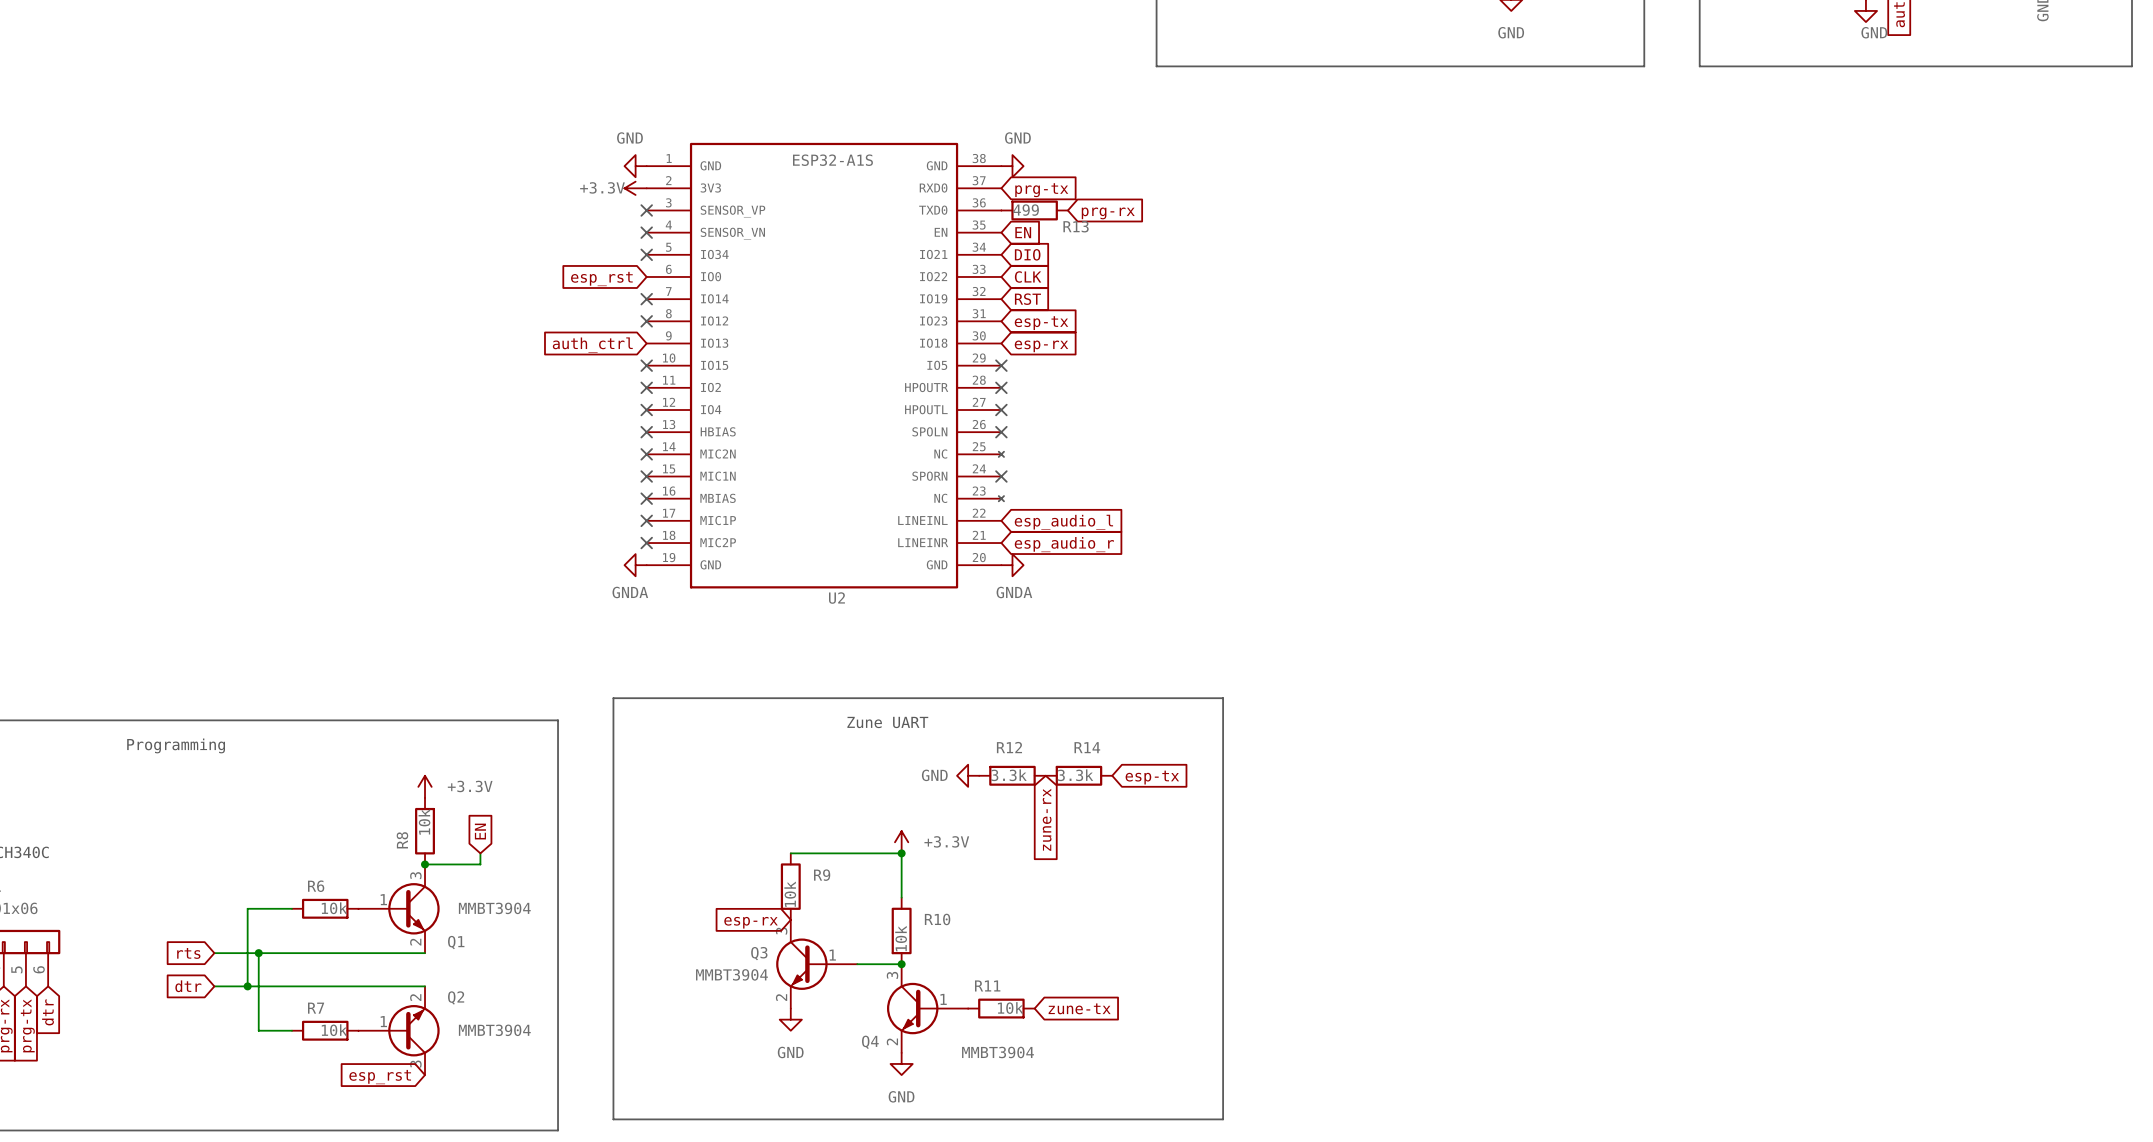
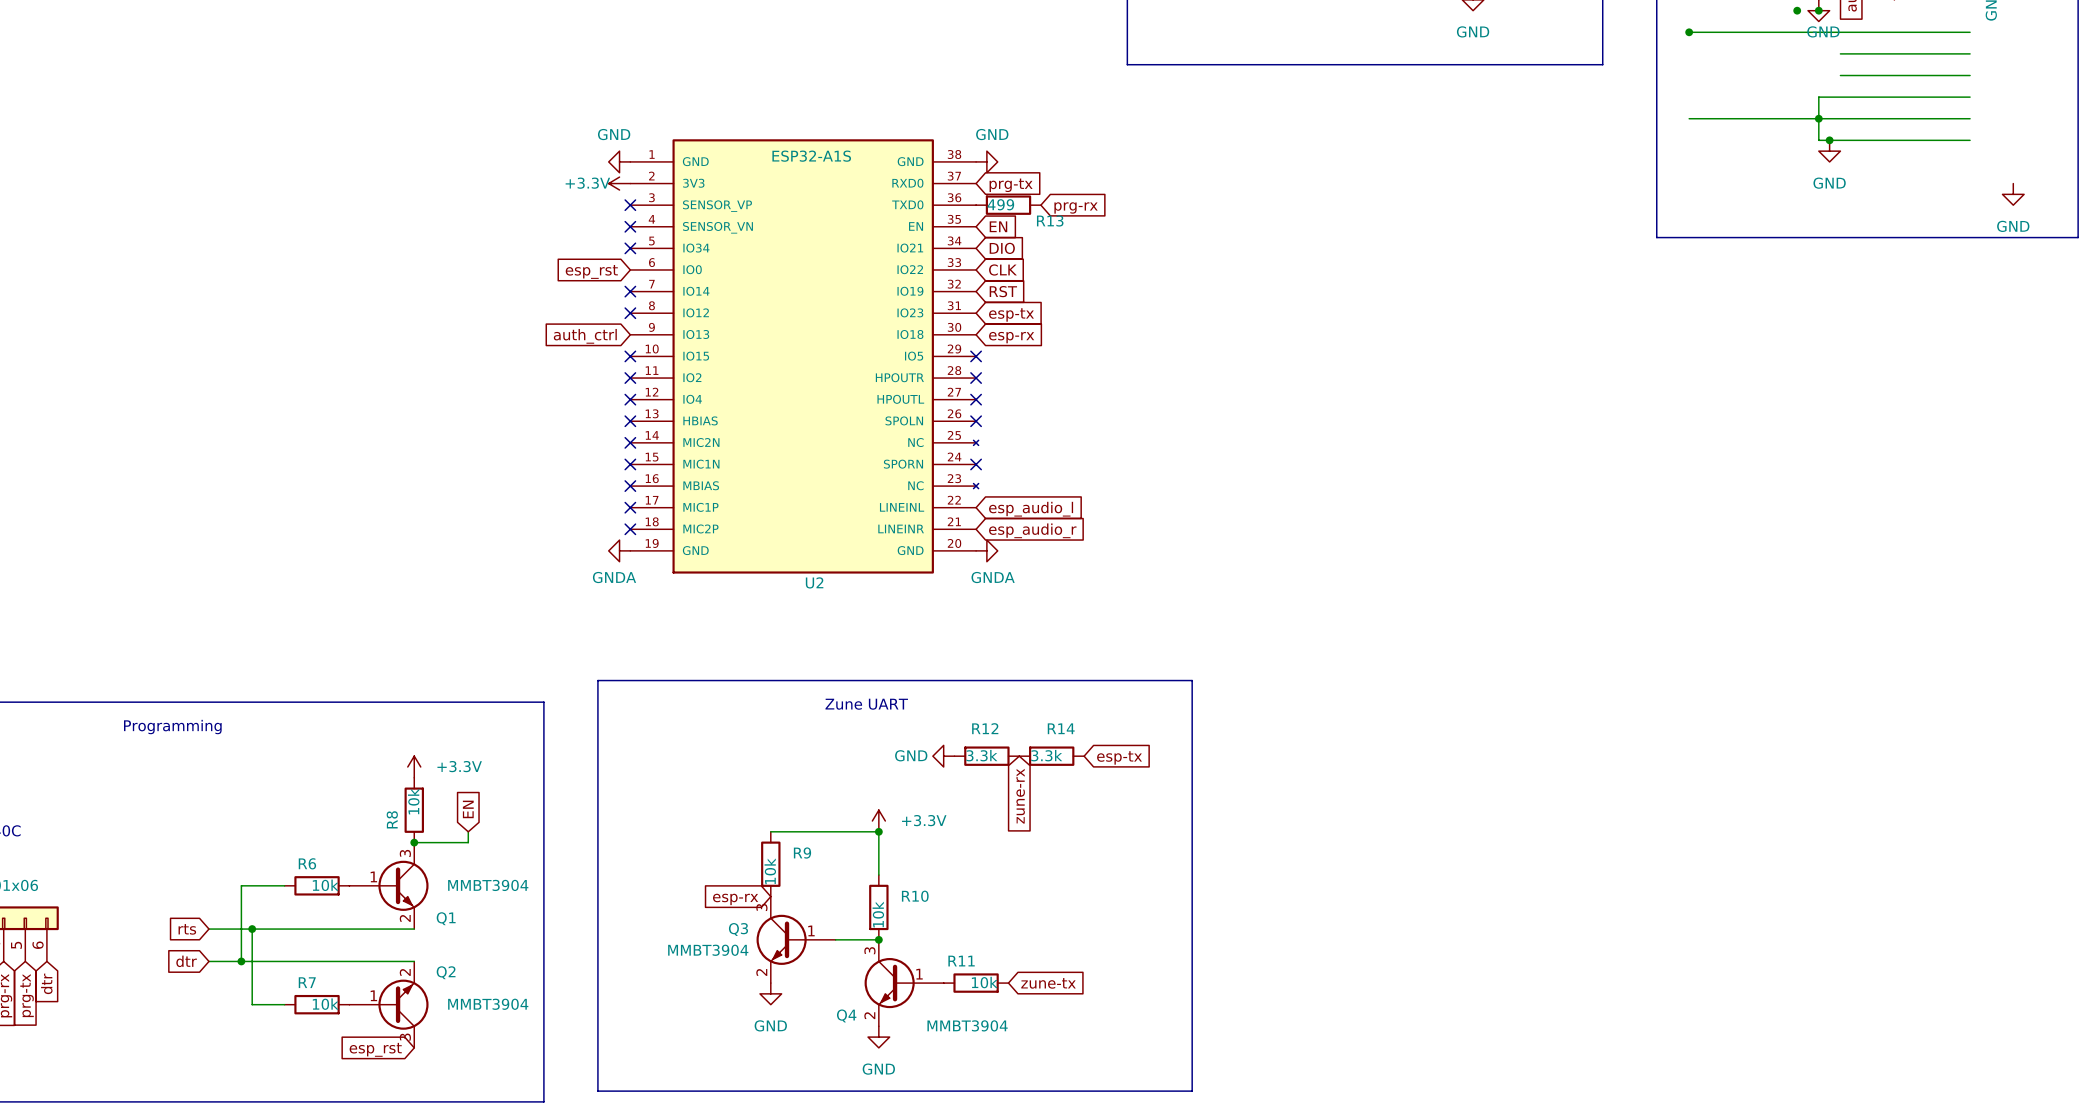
junction: none -> (1797, 10)
junction: none -> (1818, 10)
wire: none -> (1689, 32) (1970, 32)
junction: none -> (1689, 32)
wire: none -> (1840, 53) (1970, 53)
line: (1699, 66) (2131, 66) -> (1656, 64) (1656, 237) (2078, 237) (2078, 64)
wire: none -> (1840, 75) (1970, 75)
wire: none -> (1970, 97) (1818, 97) (1818, 140) (1970, 140)
wire: none -> (1689, 118) (1970, 118)
junction: none -> (1818, 118)
junction: none -> (1829, 140)
power symbol: none -> GND (1829, 151)
power symbol: none -> GND (2013, 194)

